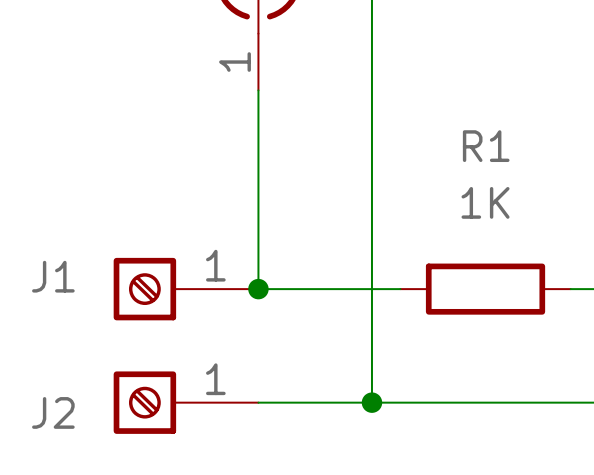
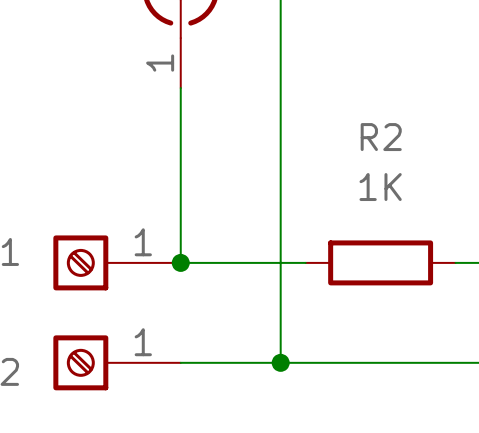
R1 name: R1 (486, 146) -> R2 (381, 137)

